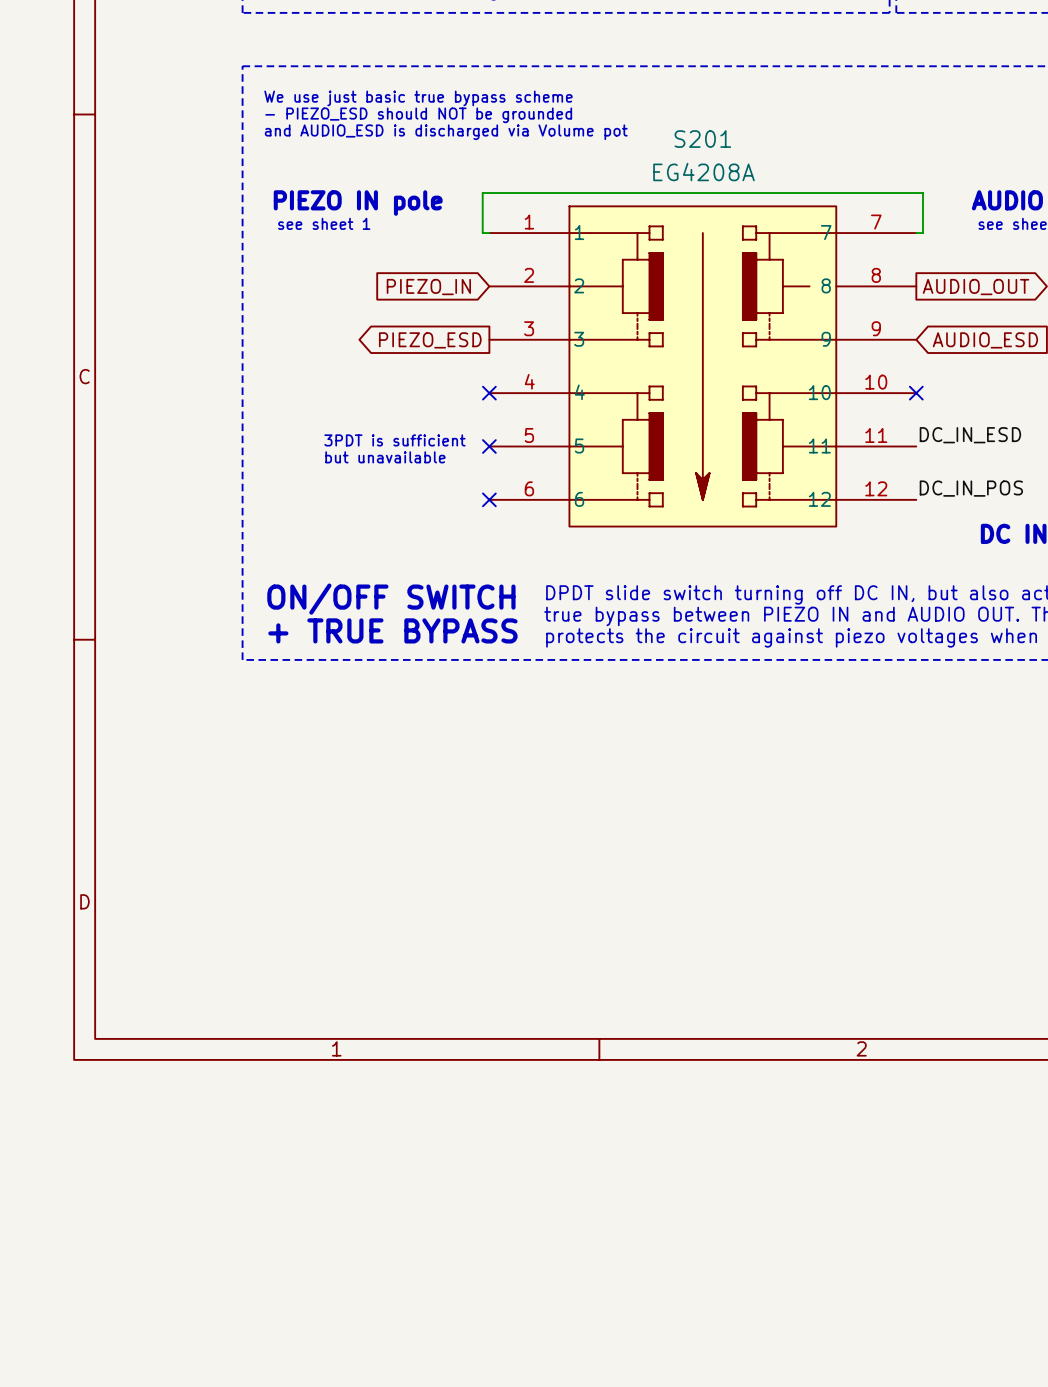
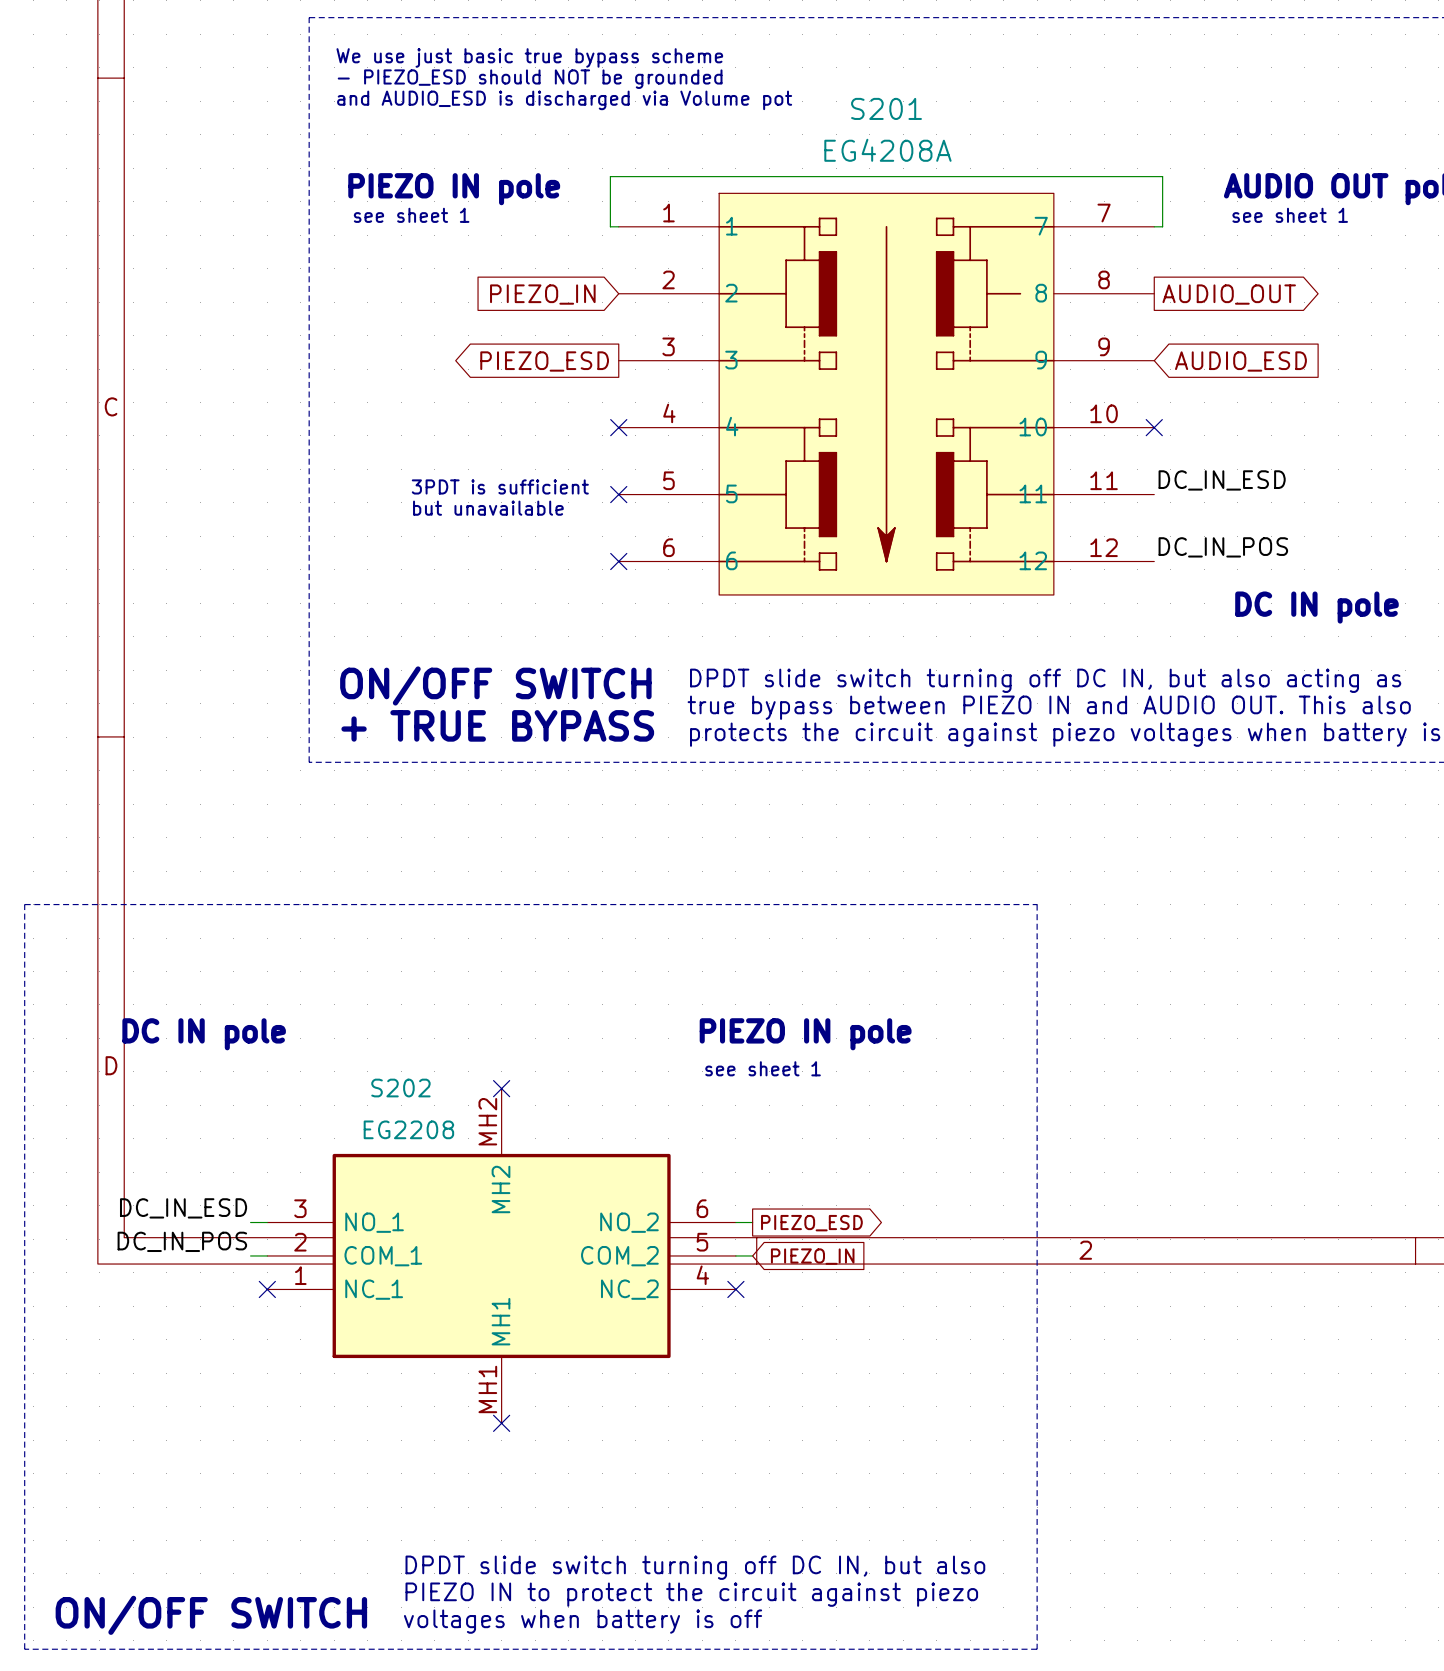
line: none -> (24, 904) (1037, 904) (1037, 1649) (24, 1649) (24, 904)
text: none -> DC IN pole (204, 1034)
text: none -> PIEZO IN pole (805, 1034)
text: none -> see sheet 1 (763, 1068)
no-connect mark: none -> (501, 1088)
label: none -> DC_IN_ESD (183, 1208)
wire: none -> (250, 1222) (267, 1222)
wire: none -> (735, 1222) (752, 1222)
global label: none -> PIEZO_ESD (811, 1223)
label: none -> DC_IN_POS (182, 1241)
wire: none -> (250, 1255) (267, 1255)
S202: none -> EG2208 (501, 1255)
wire: none -> (735, 1255) (752, 1255)
global label: none -> PIEZO_IN (812, 1256)
no-connect mark: none -> (267, 1289)
no-connect mark: none -> (735, 1289)
no-connect mark: none -> (501, 1423)
text: none -> DPDT slide switch turning off DC IN, but also (695, 1567)
text: none -> PIEZO IN to protect the circuit against piezo (691, 1594)
text: none -> ON/OFF SWITCH (211, 1615)
text: none -> voltages when battery is off (583, 1621)

